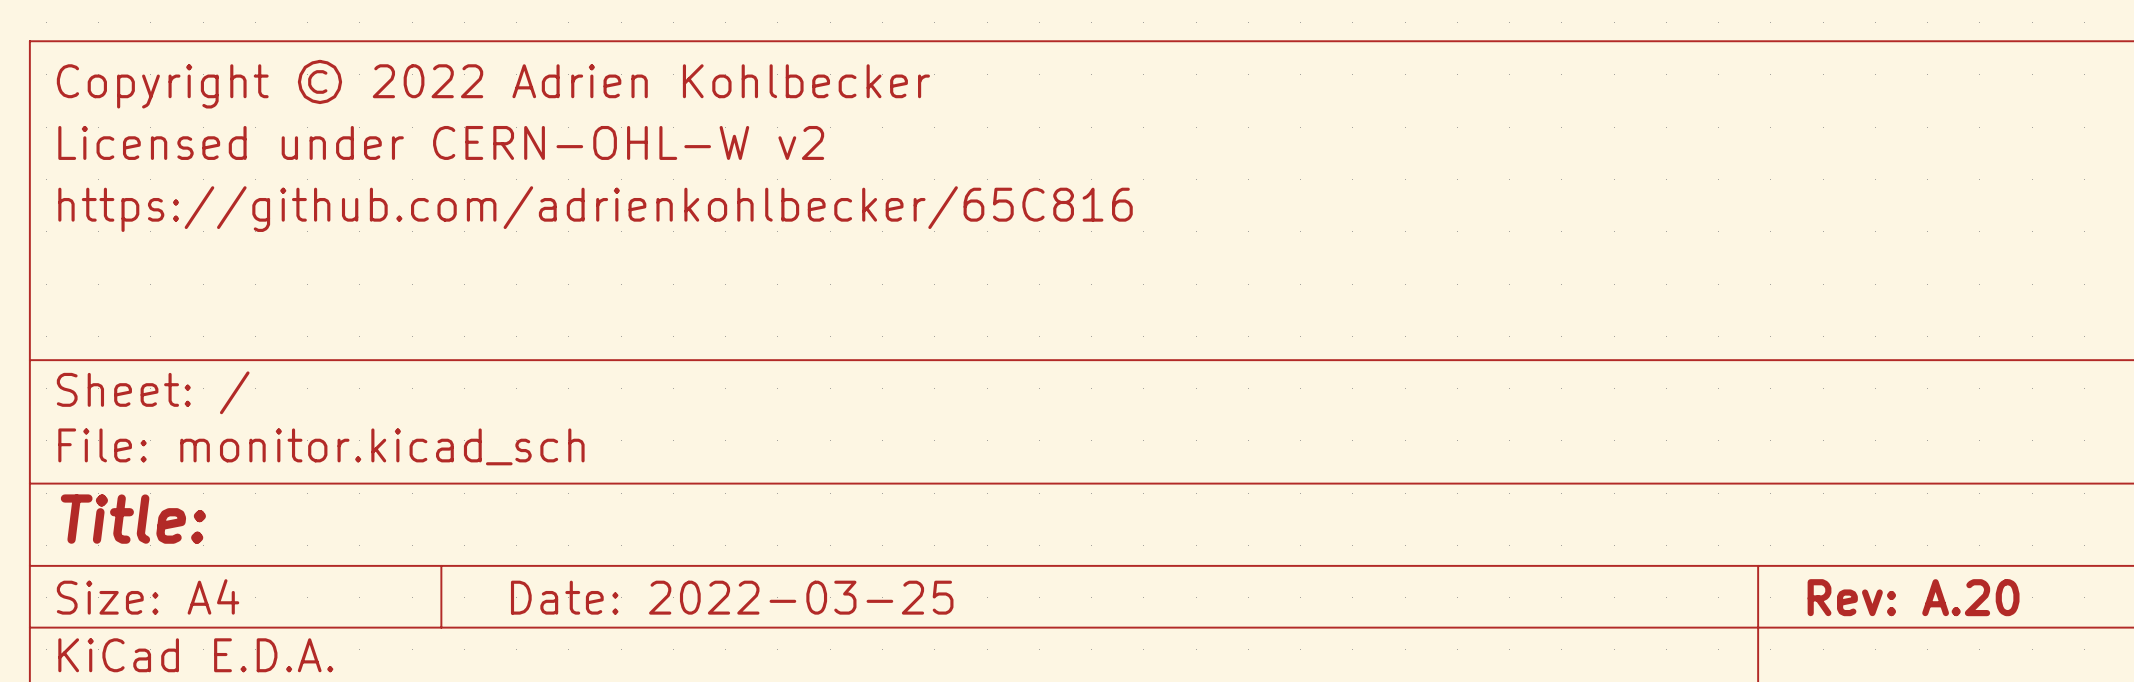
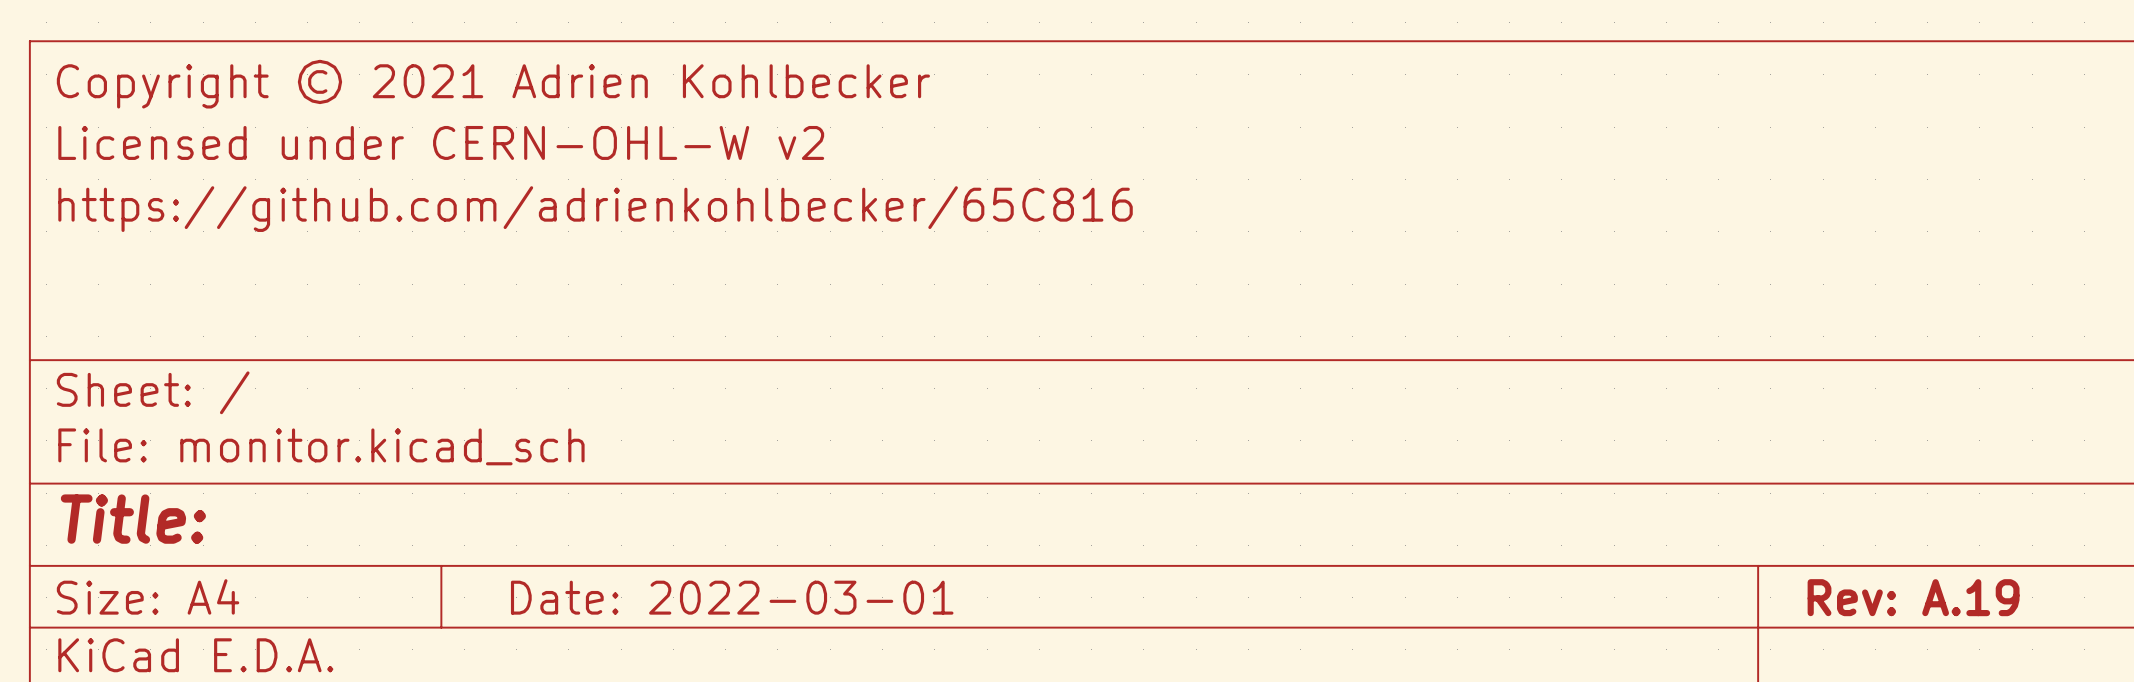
title block: Copyright © 2022 Adrien Kohlbecker (493, 84) -> Copyright © 2021 Adrien Kohlbecker (493, 84)
title block: Date: 2022-03-25 (732, 597) -> Date: 2022-03-01 (732, 597)
title block: Rev: A.20 (1913, 597) -> Rev: A.19 (1913, 597)

